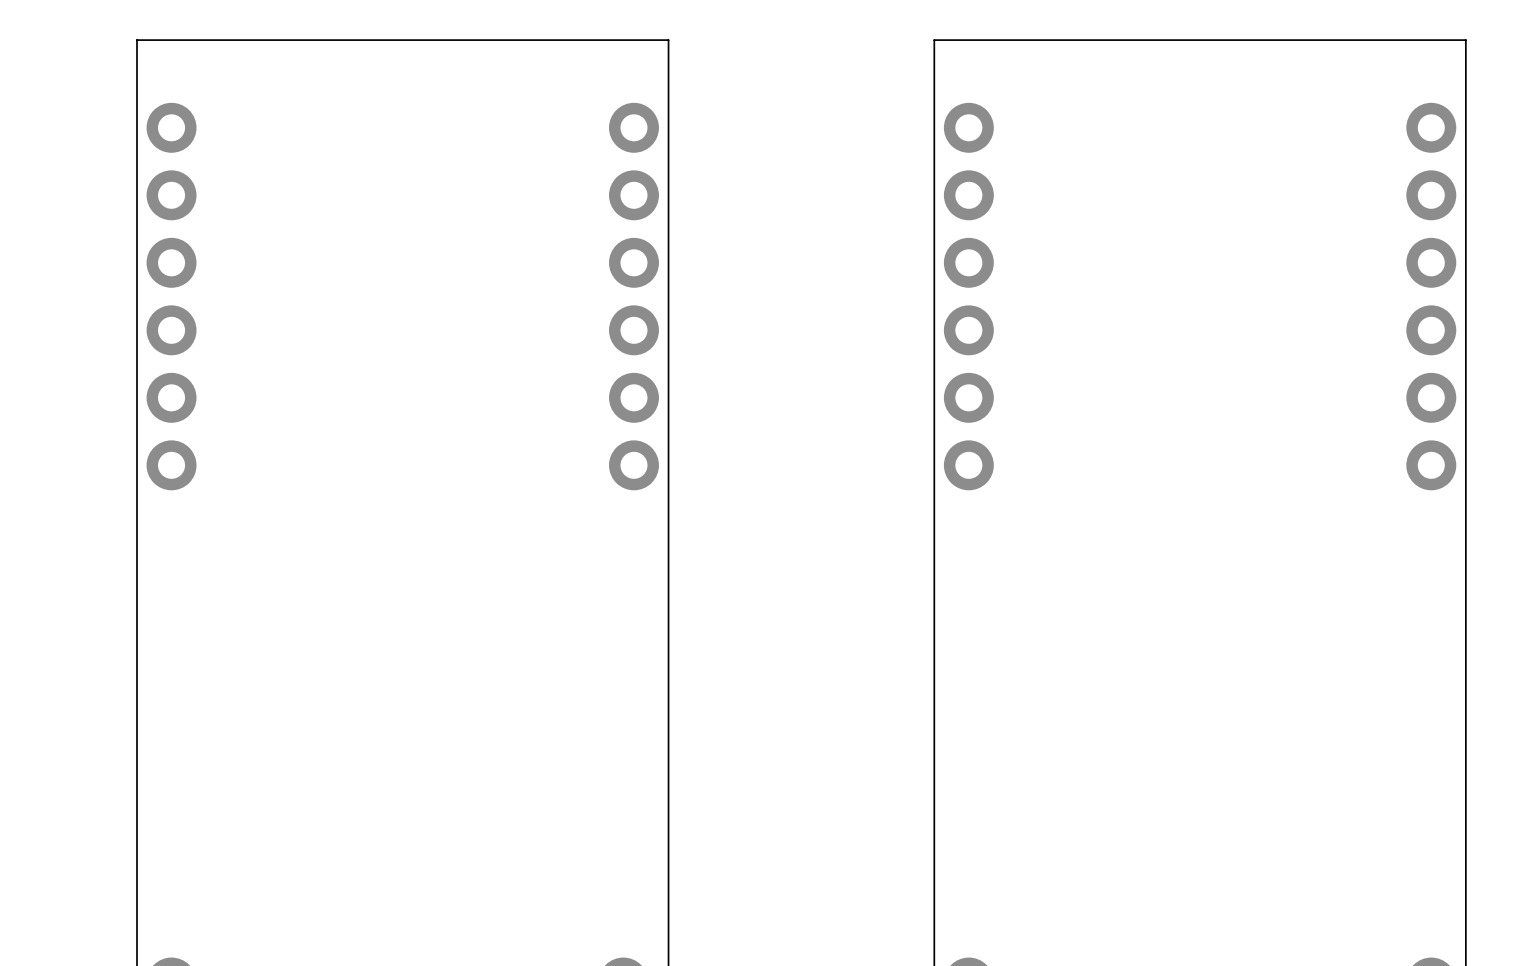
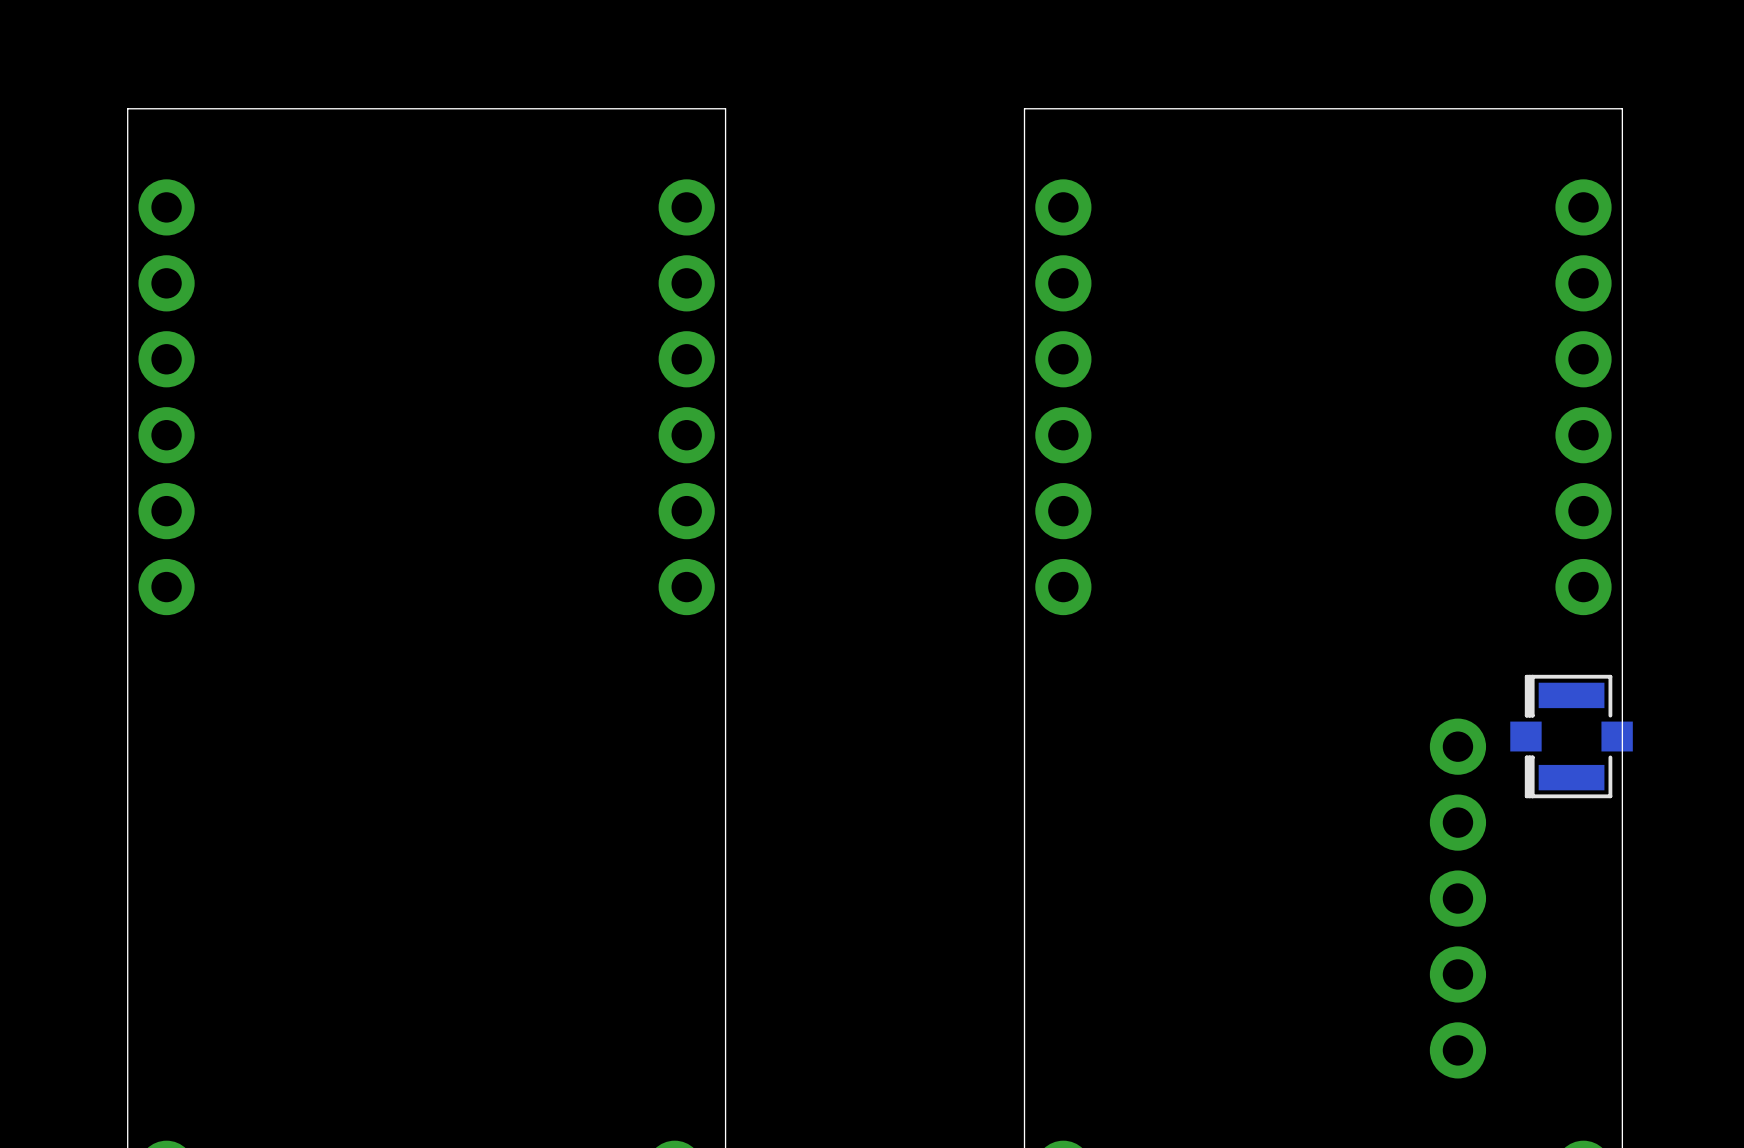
part: none -> (1571, 736)
part: none -> (1457, 898)

